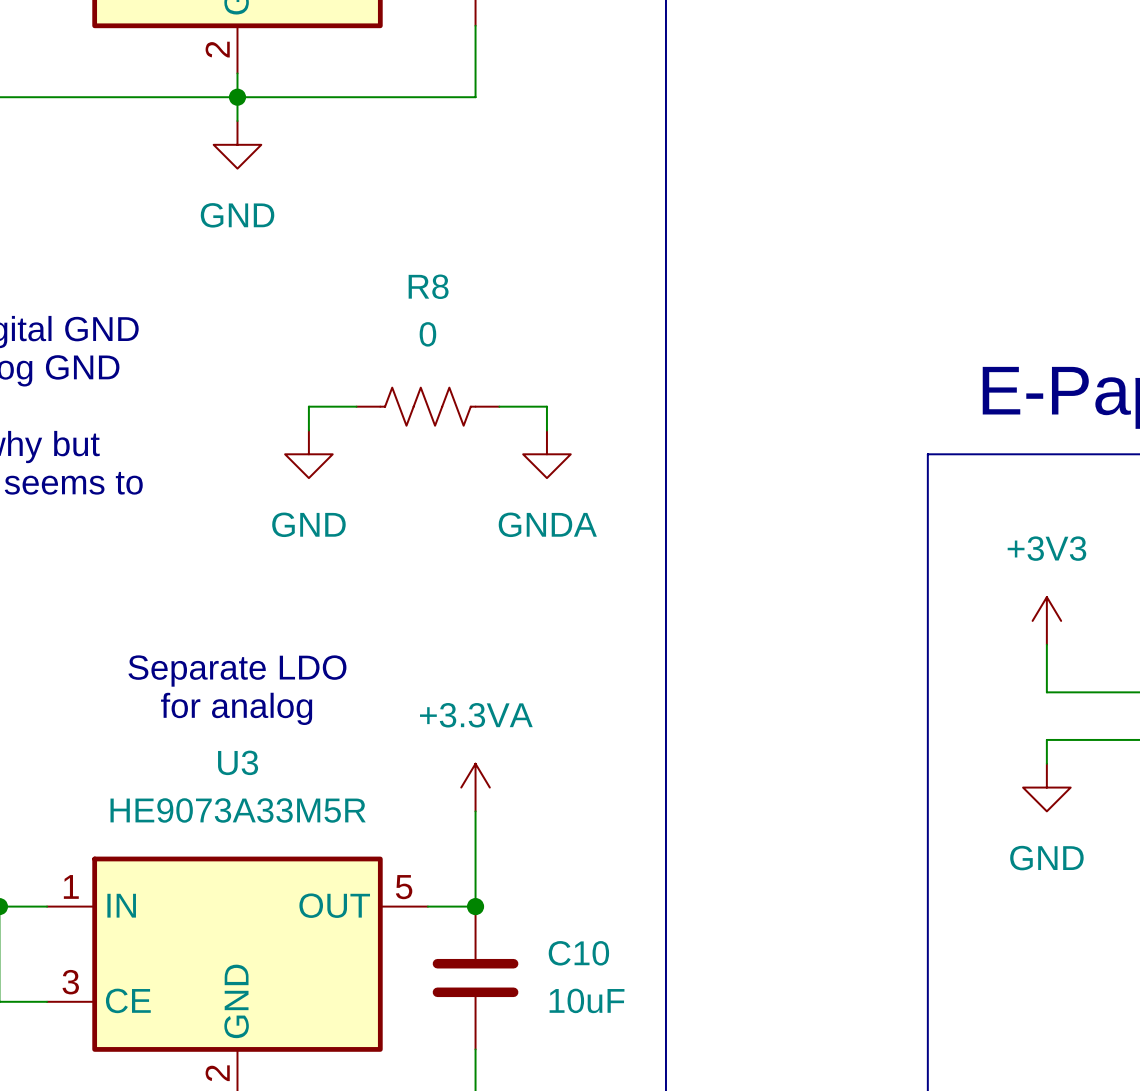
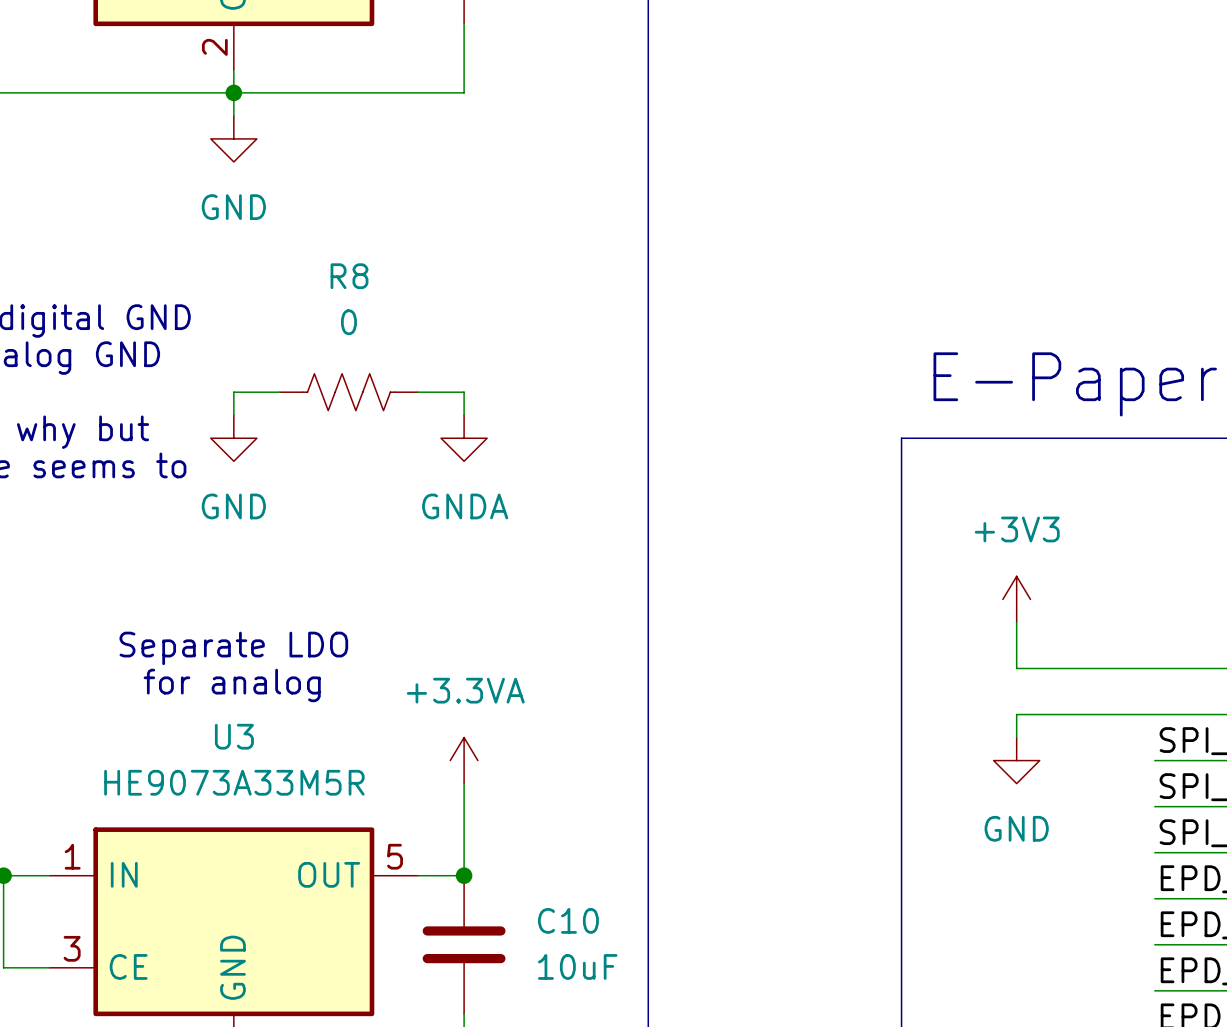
wire: (356, 406) (308, 406) (308, 430) -> (279, 392) (233, 392) (233, 415)
R8 position: (427, 406) -> (348, 392)
wire: (499, 406) (546, 406) (546, 430) -> (418, 392) (464, 392) (464, 415)
power symbol position: GND (308, 454) -> GND (233, 438)
power symbol position: GNDA (546, 454) -> GNDA (464, 438)

